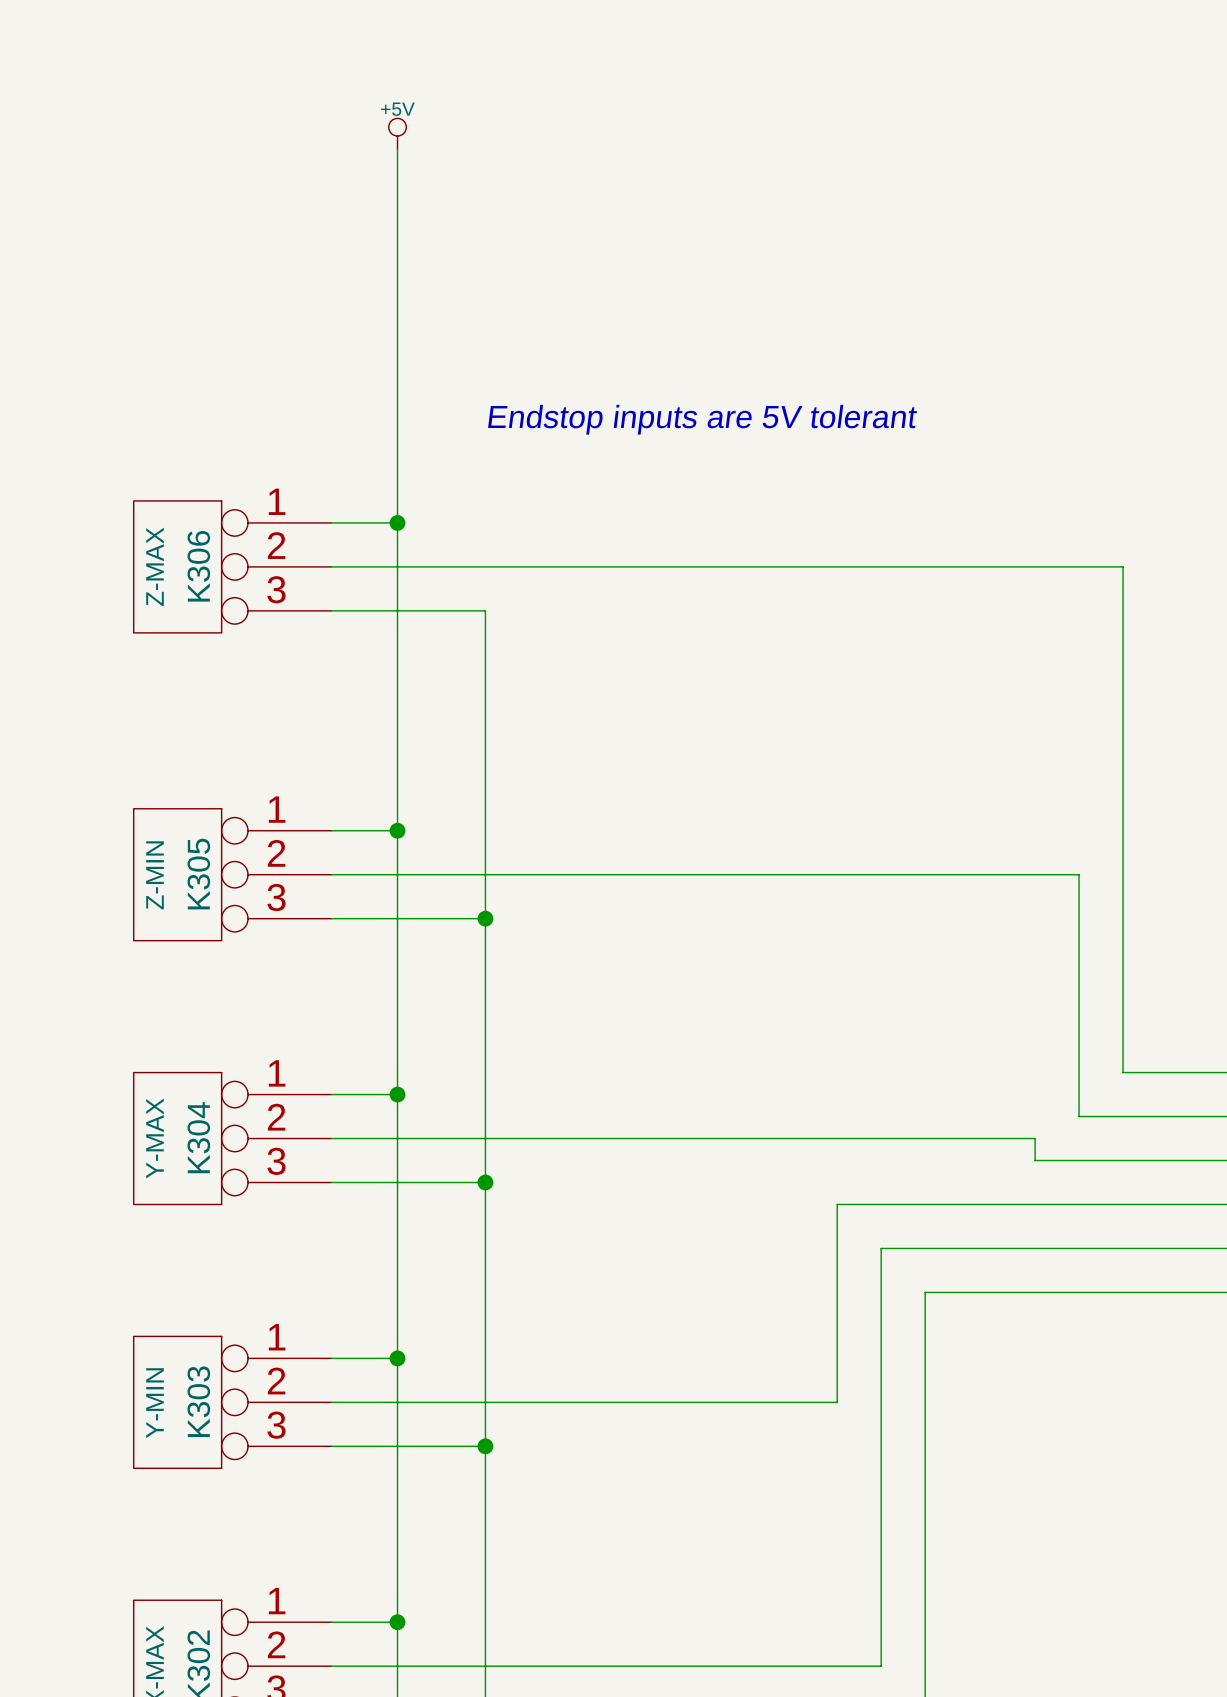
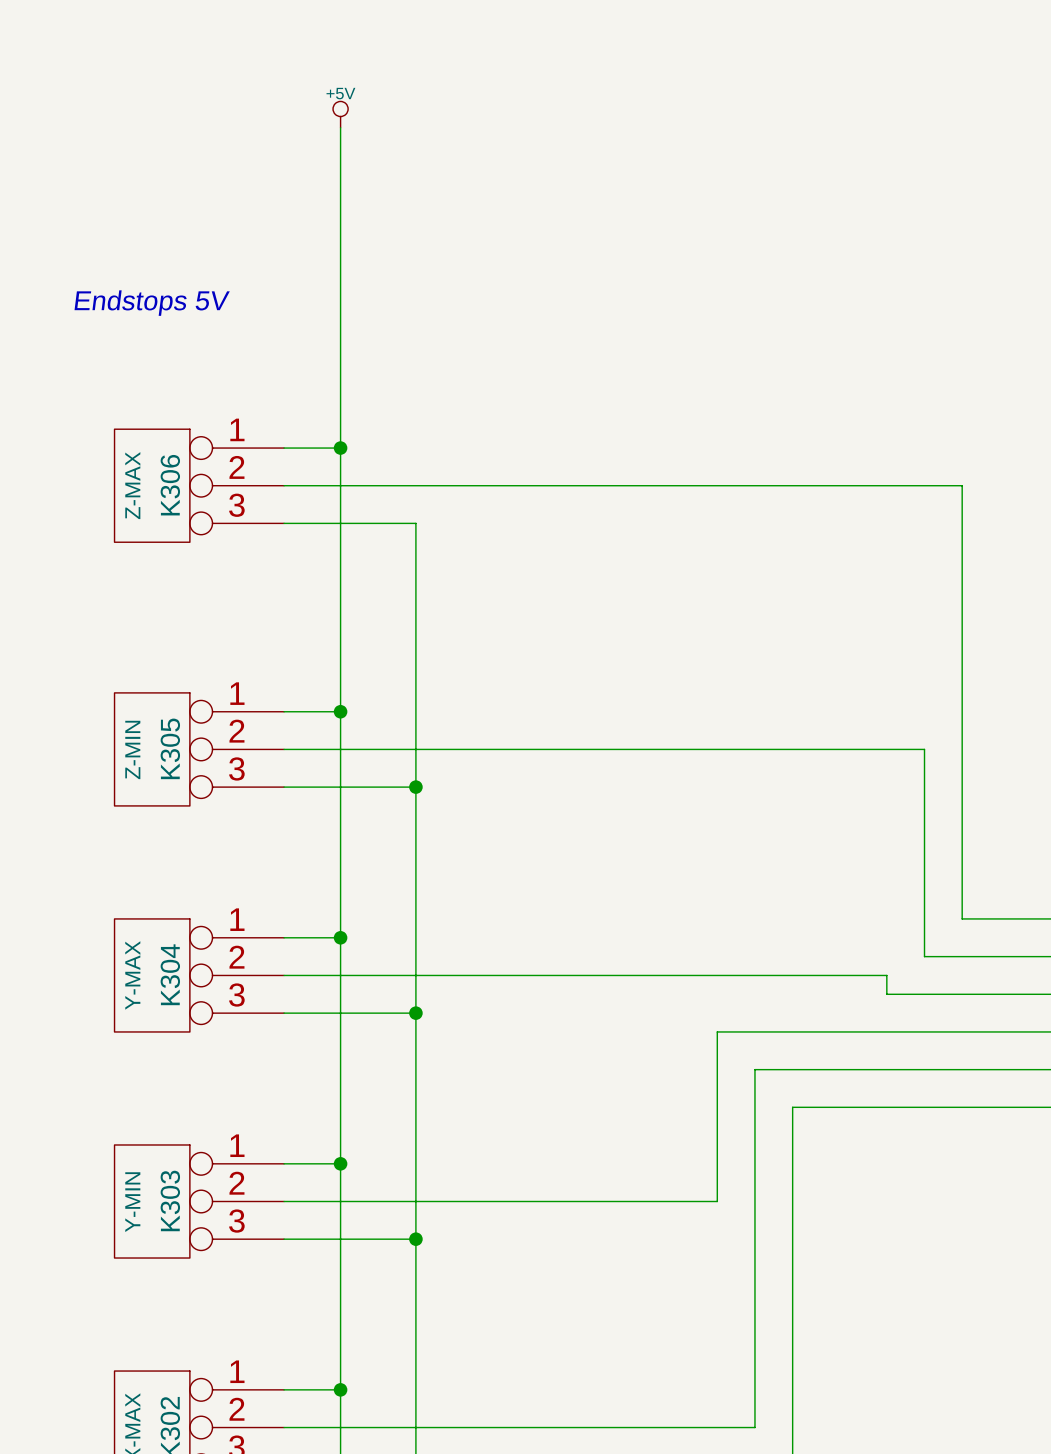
text: none -> Endstops 5V (152, 303)
text: Endstop inputs are 5V tolerant (702, 419) -> none

